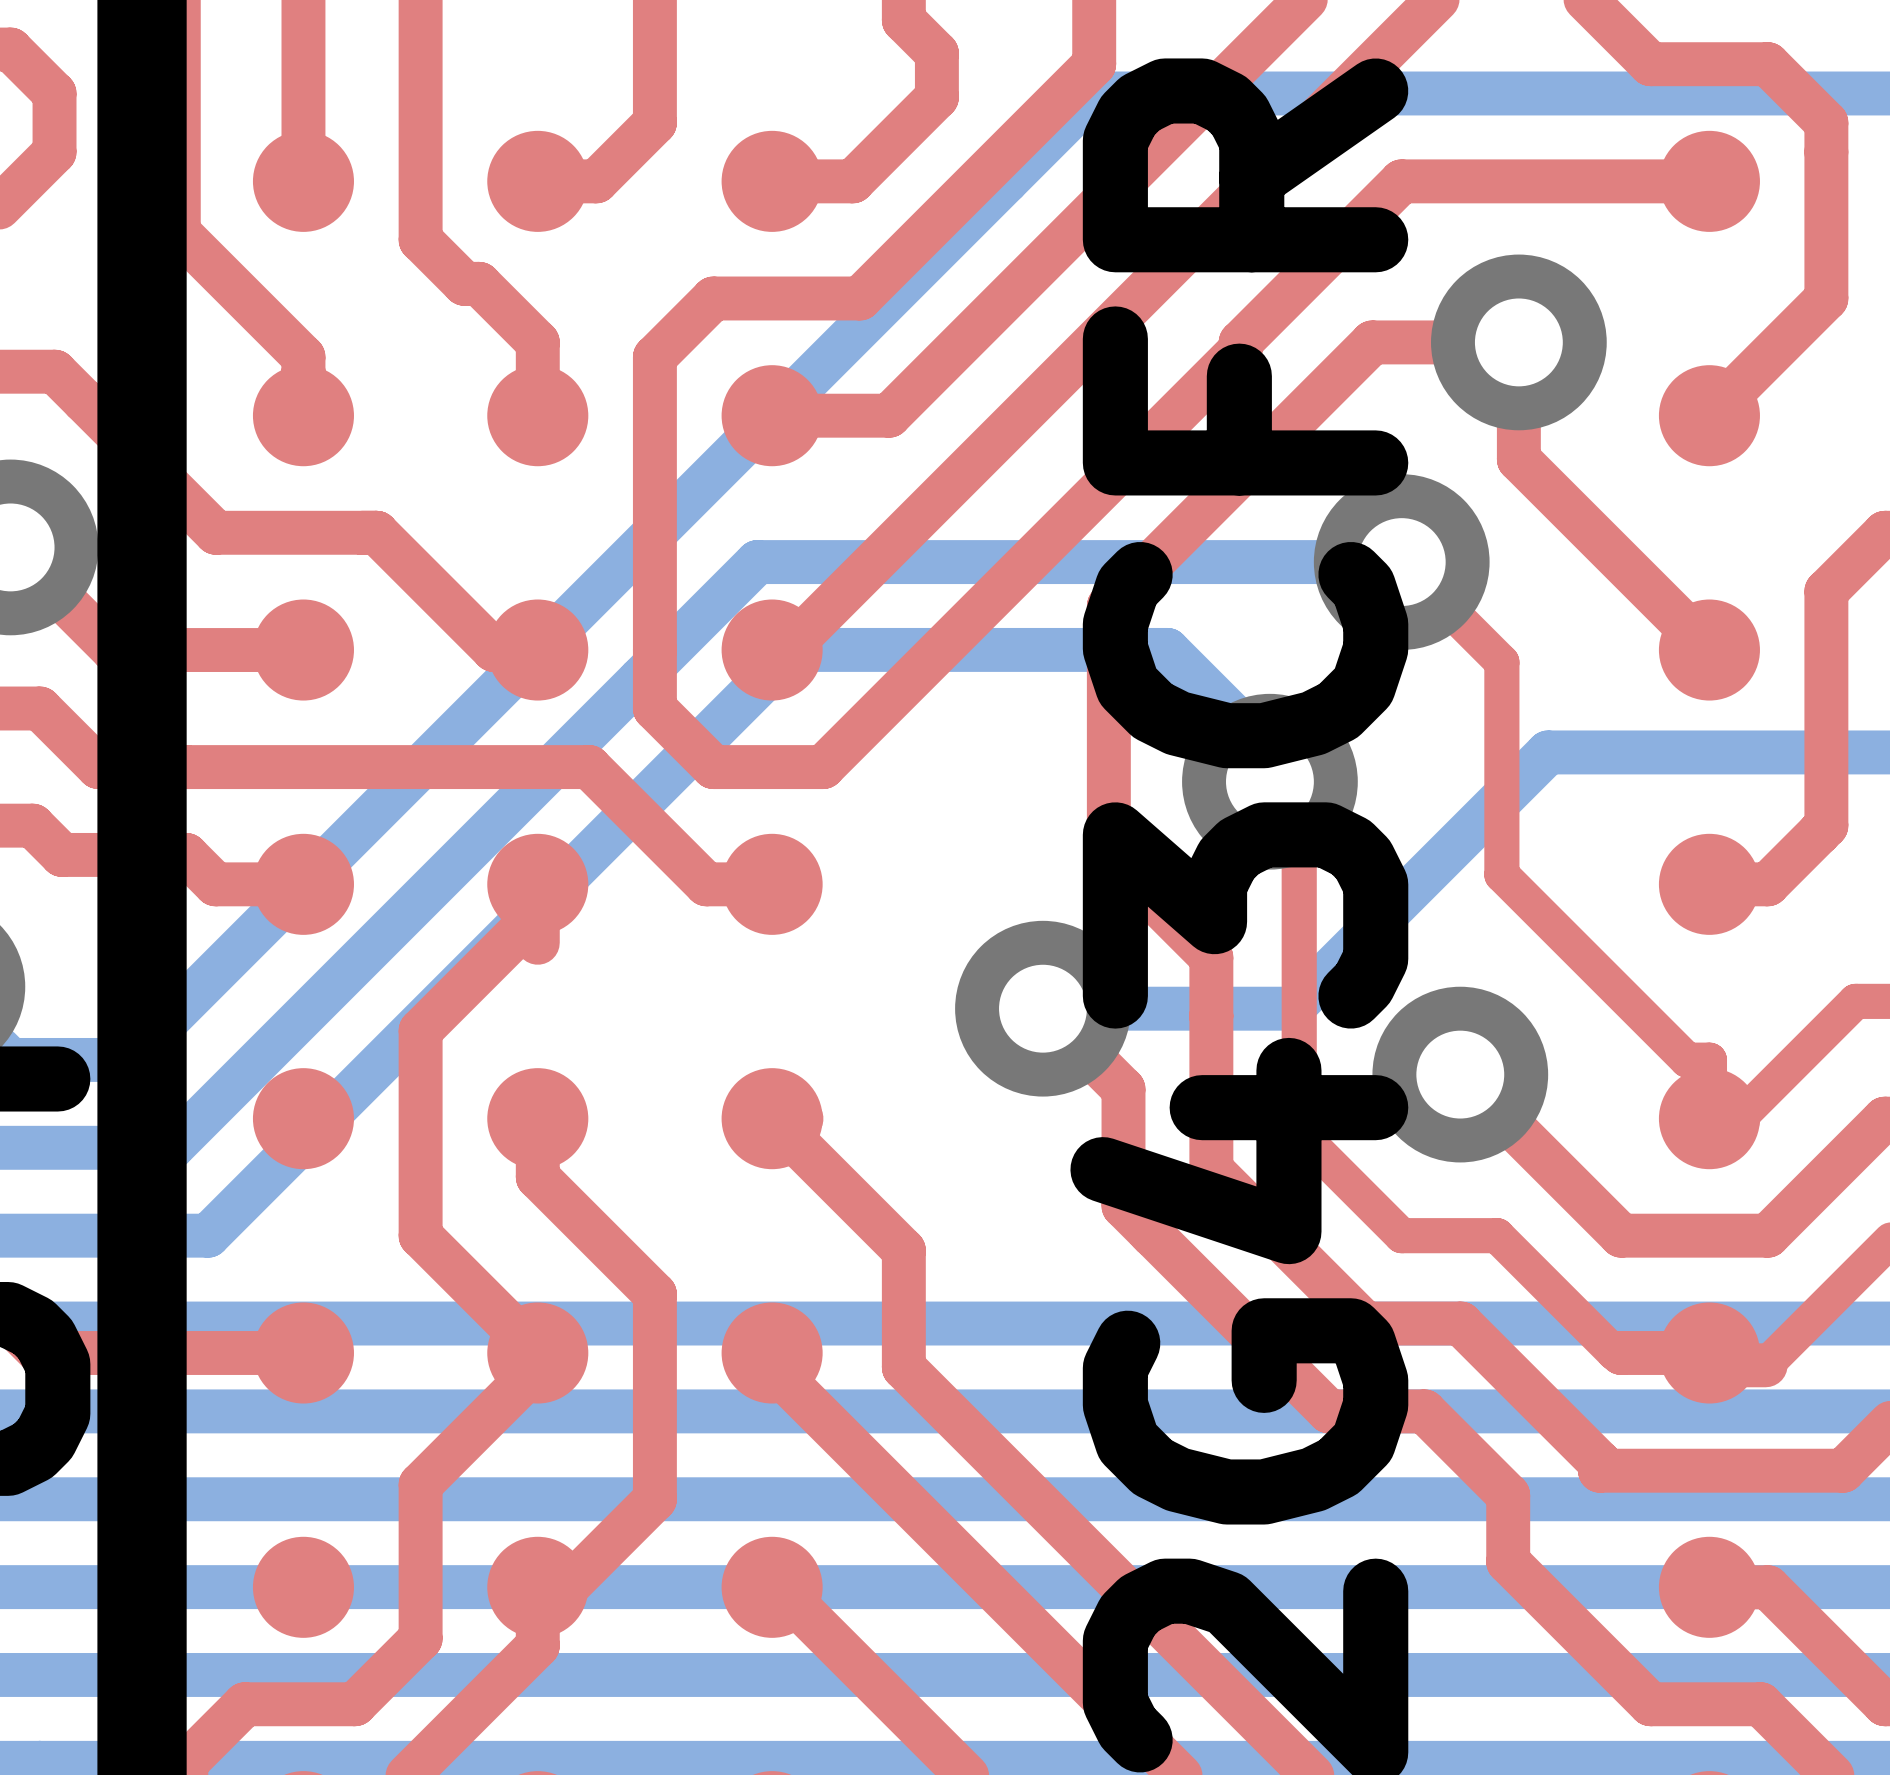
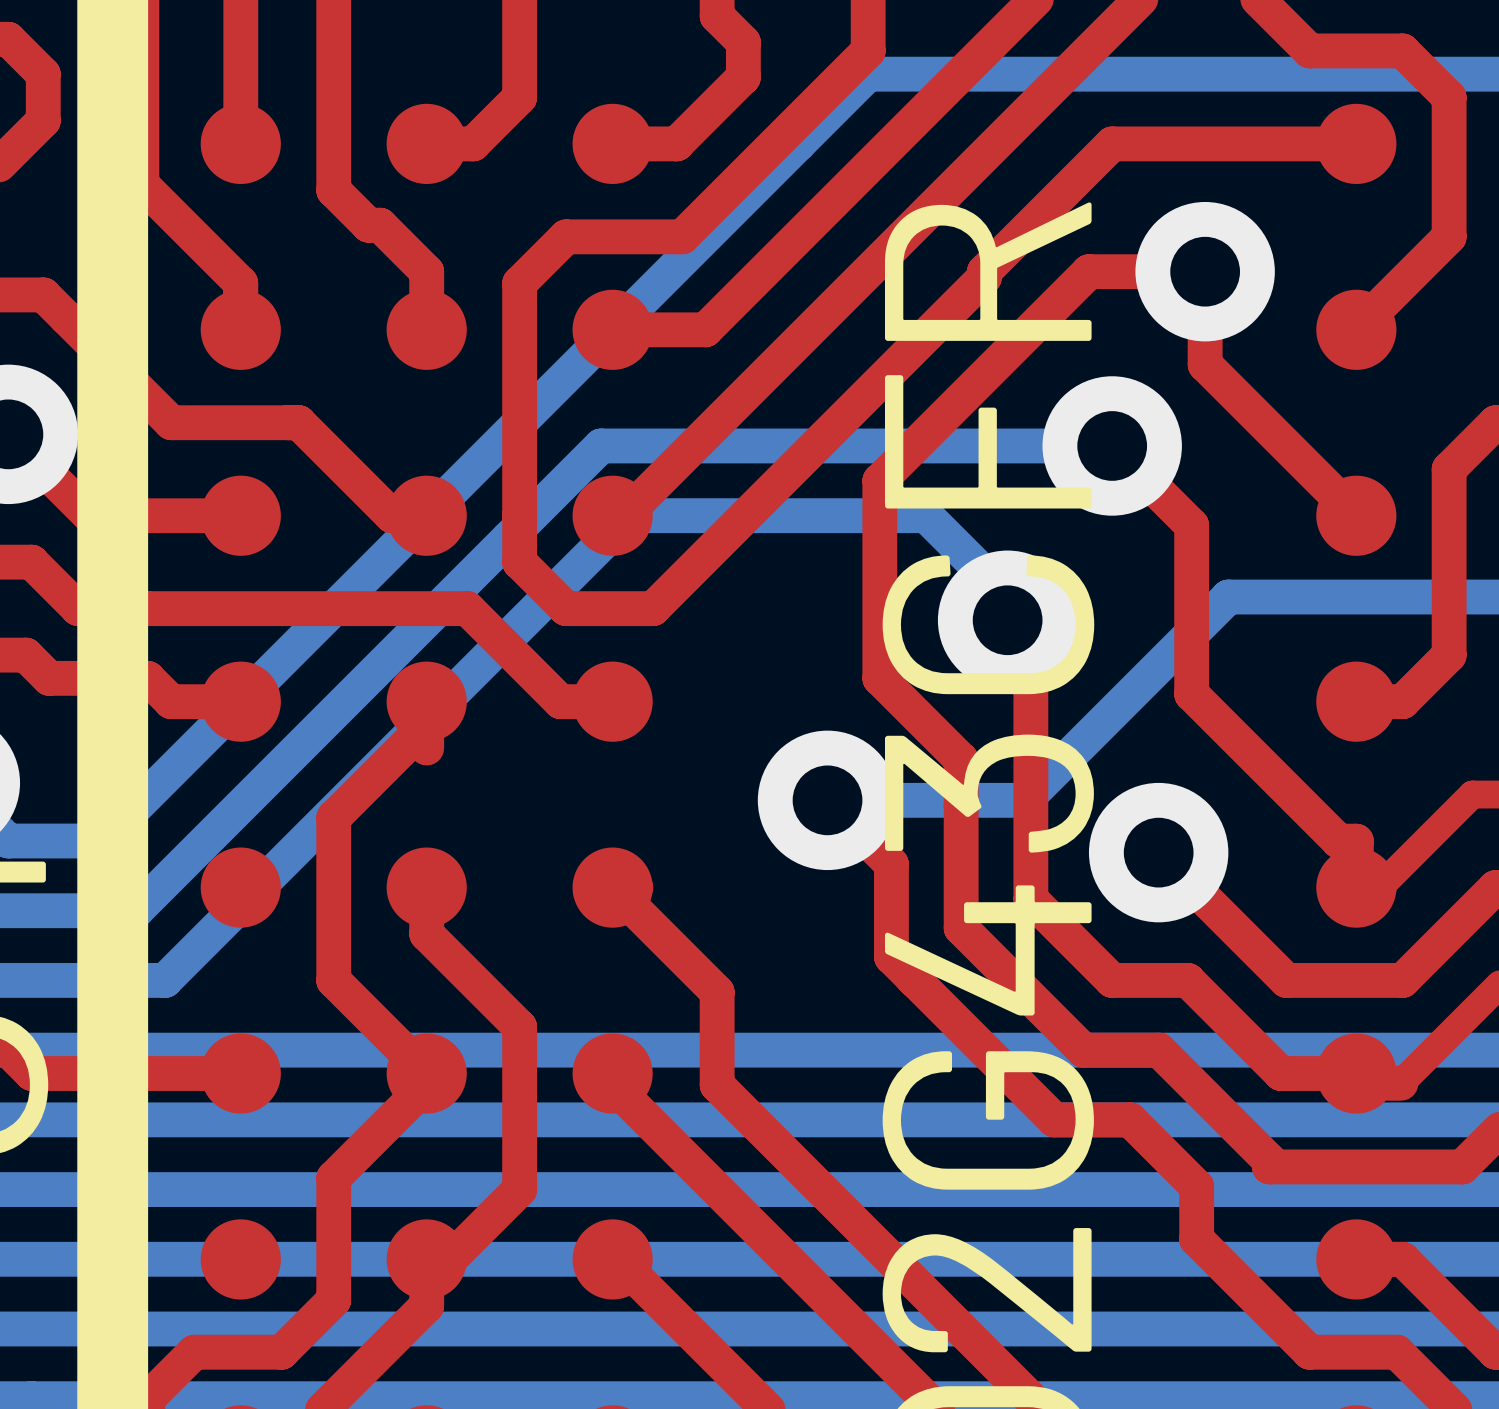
top track width: thin (1401, 562) (1501, 662) (1501, 874) (1687, 1060) (1709, 1060) (1709, 1118) -> thick (1112, 445) (1191, 525) (1191, 694) (1338, 841) (1356, 841) (1356, 887)
top track width: thin (1299, 811) (1299, 1133) (1401, 1235) (1497, 1235) (1614, 1352) (1621, 1352) -> thick (1030, 643) (1030, 899) (1112, 980) (1187, 980) (1280, 1073) (1286, 1073)

